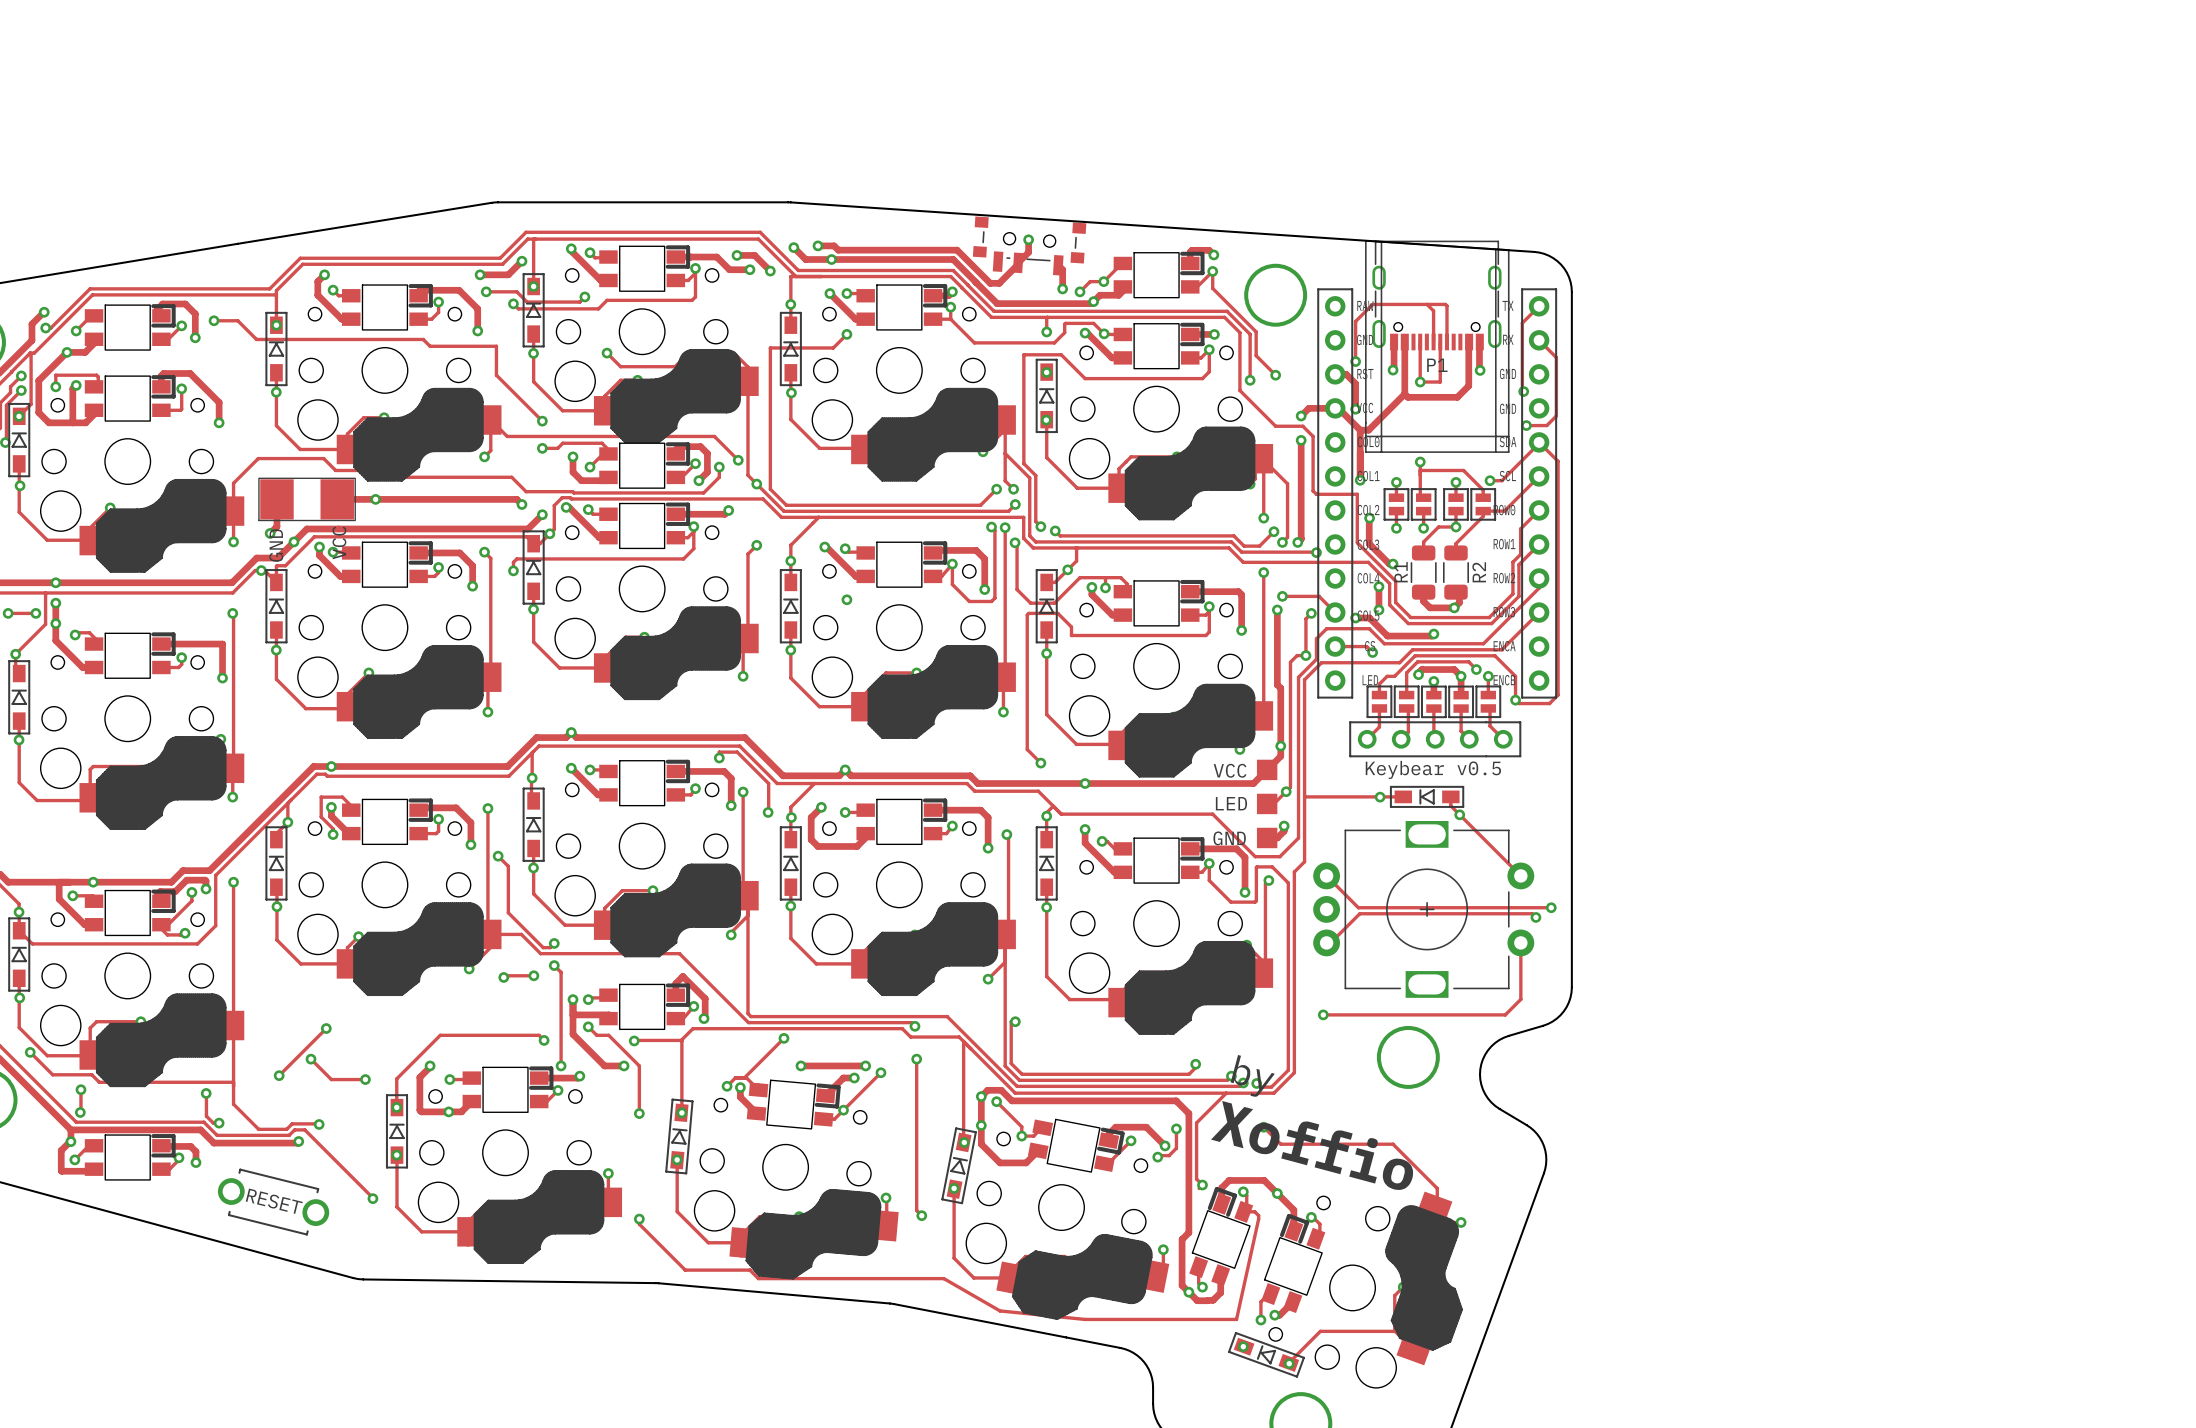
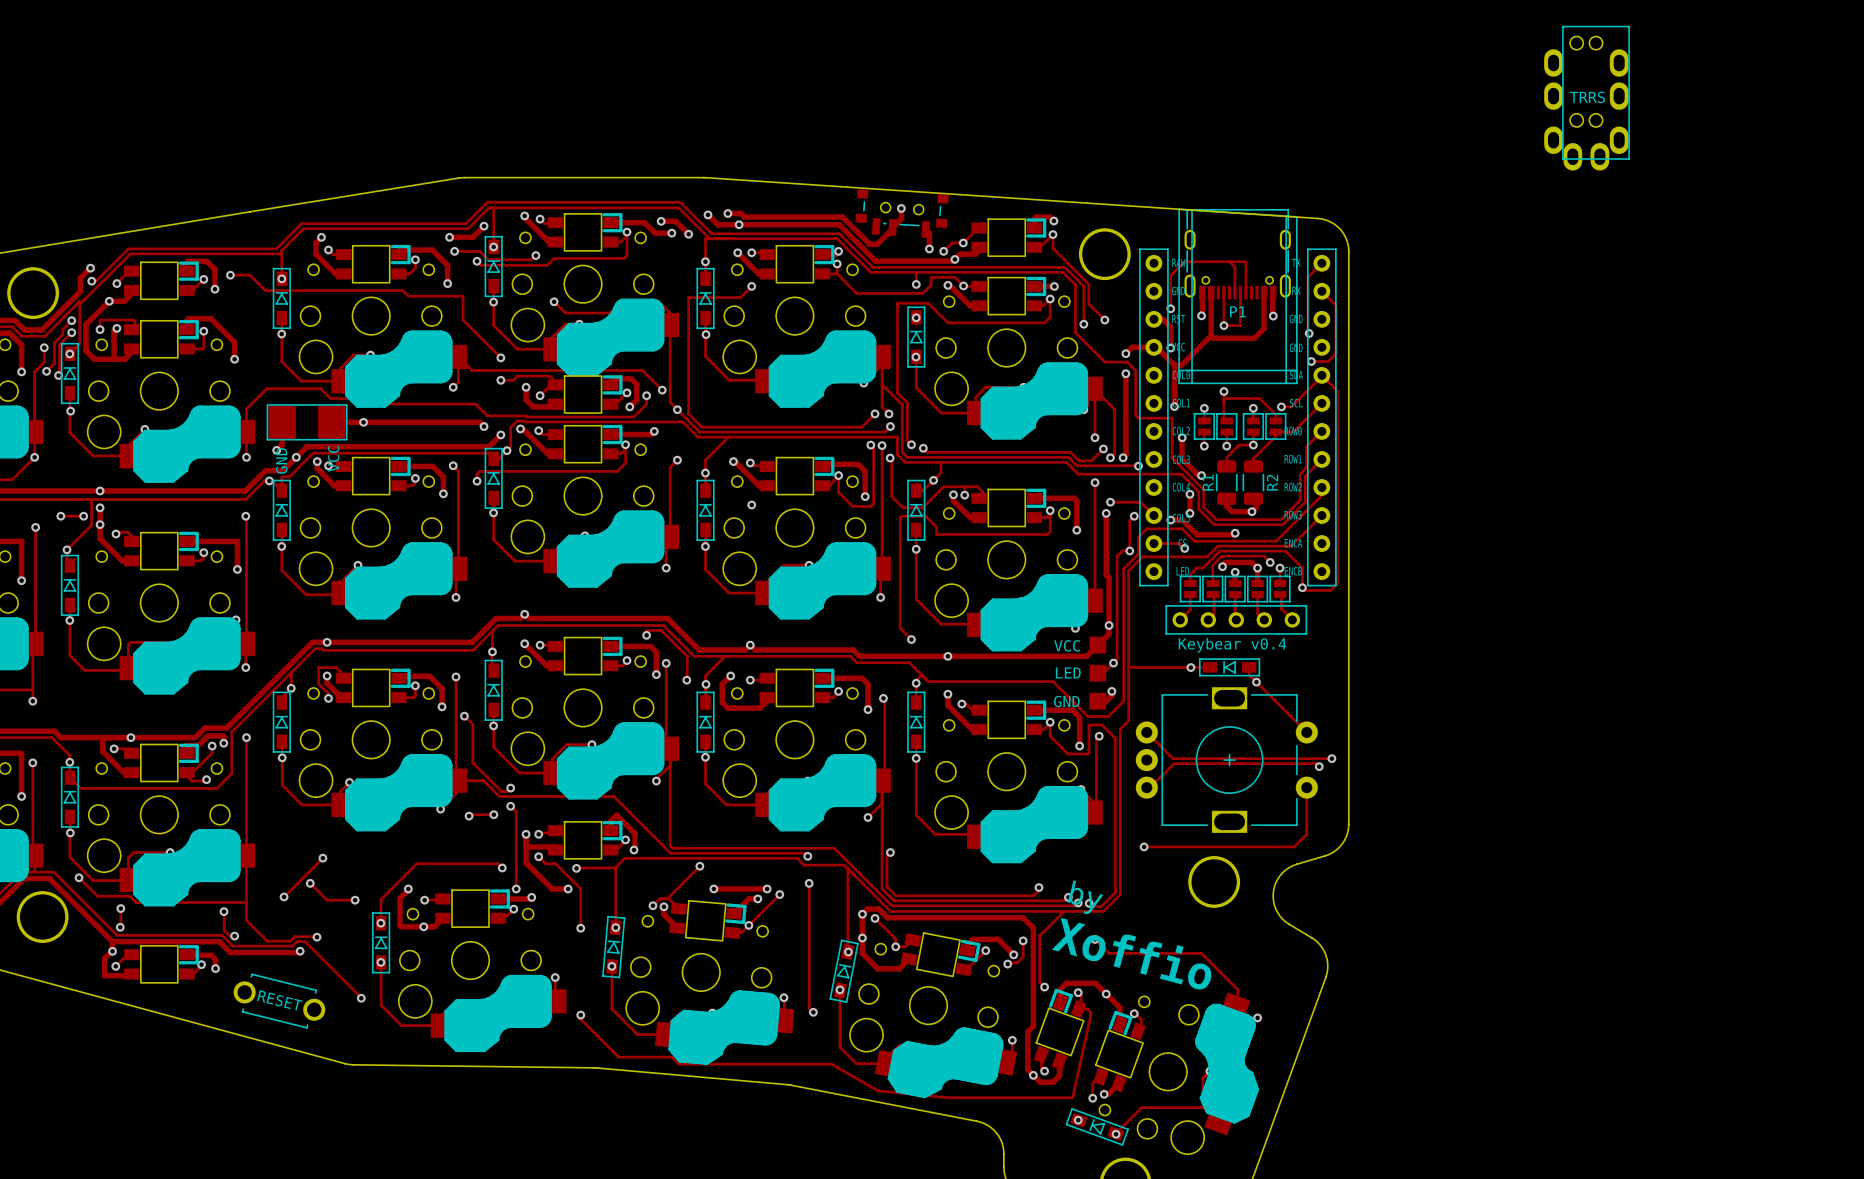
part: none -> (1587, 98)
text: Keybear v0.5 (1433, 769) -> Keybear v0.4 (1232, 645)

